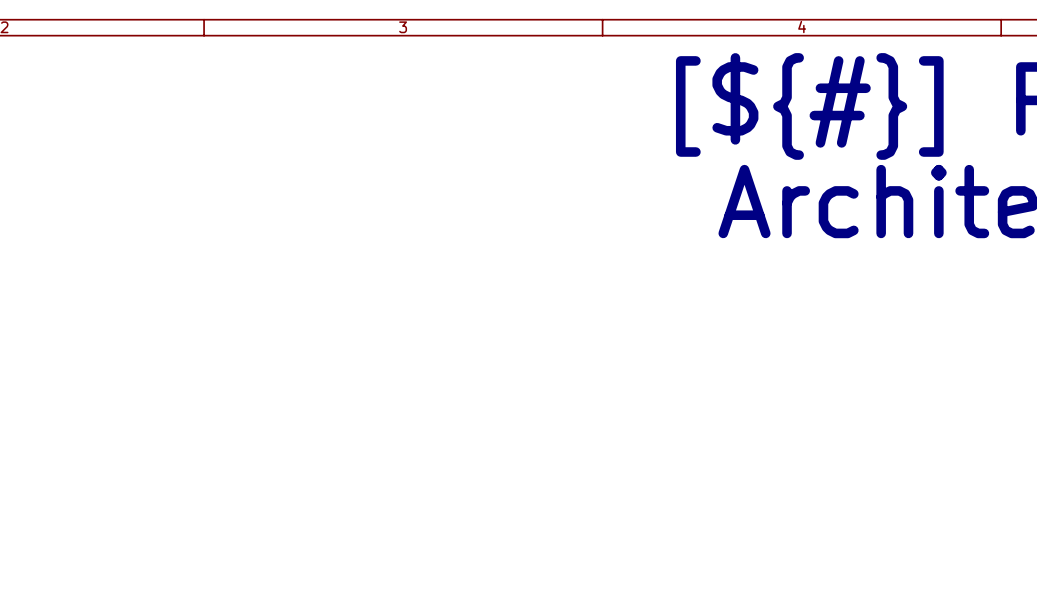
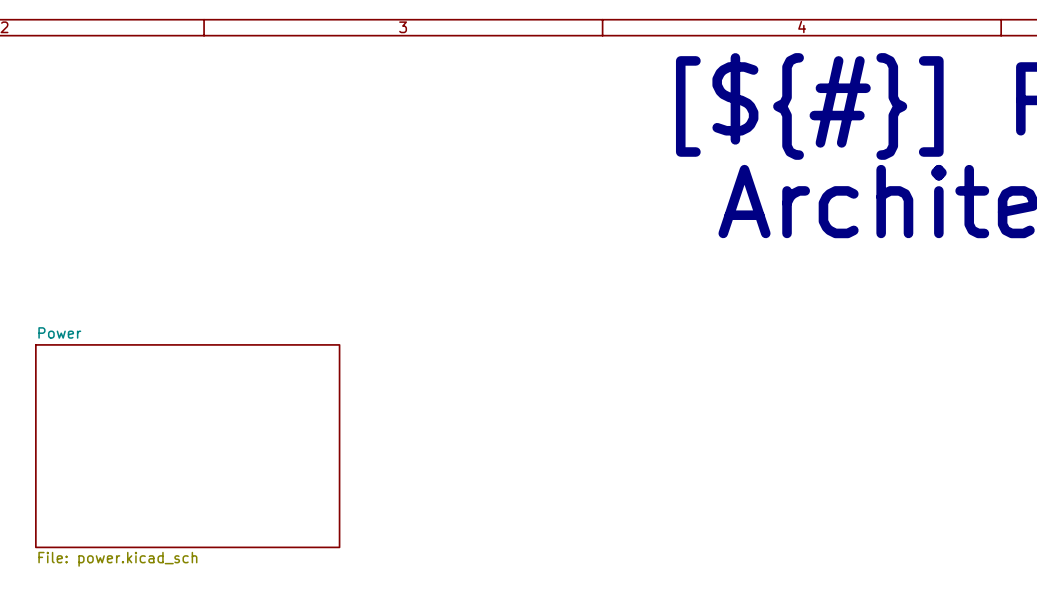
sheet Power: none -> File: power.kicad_sch (187, 446)

